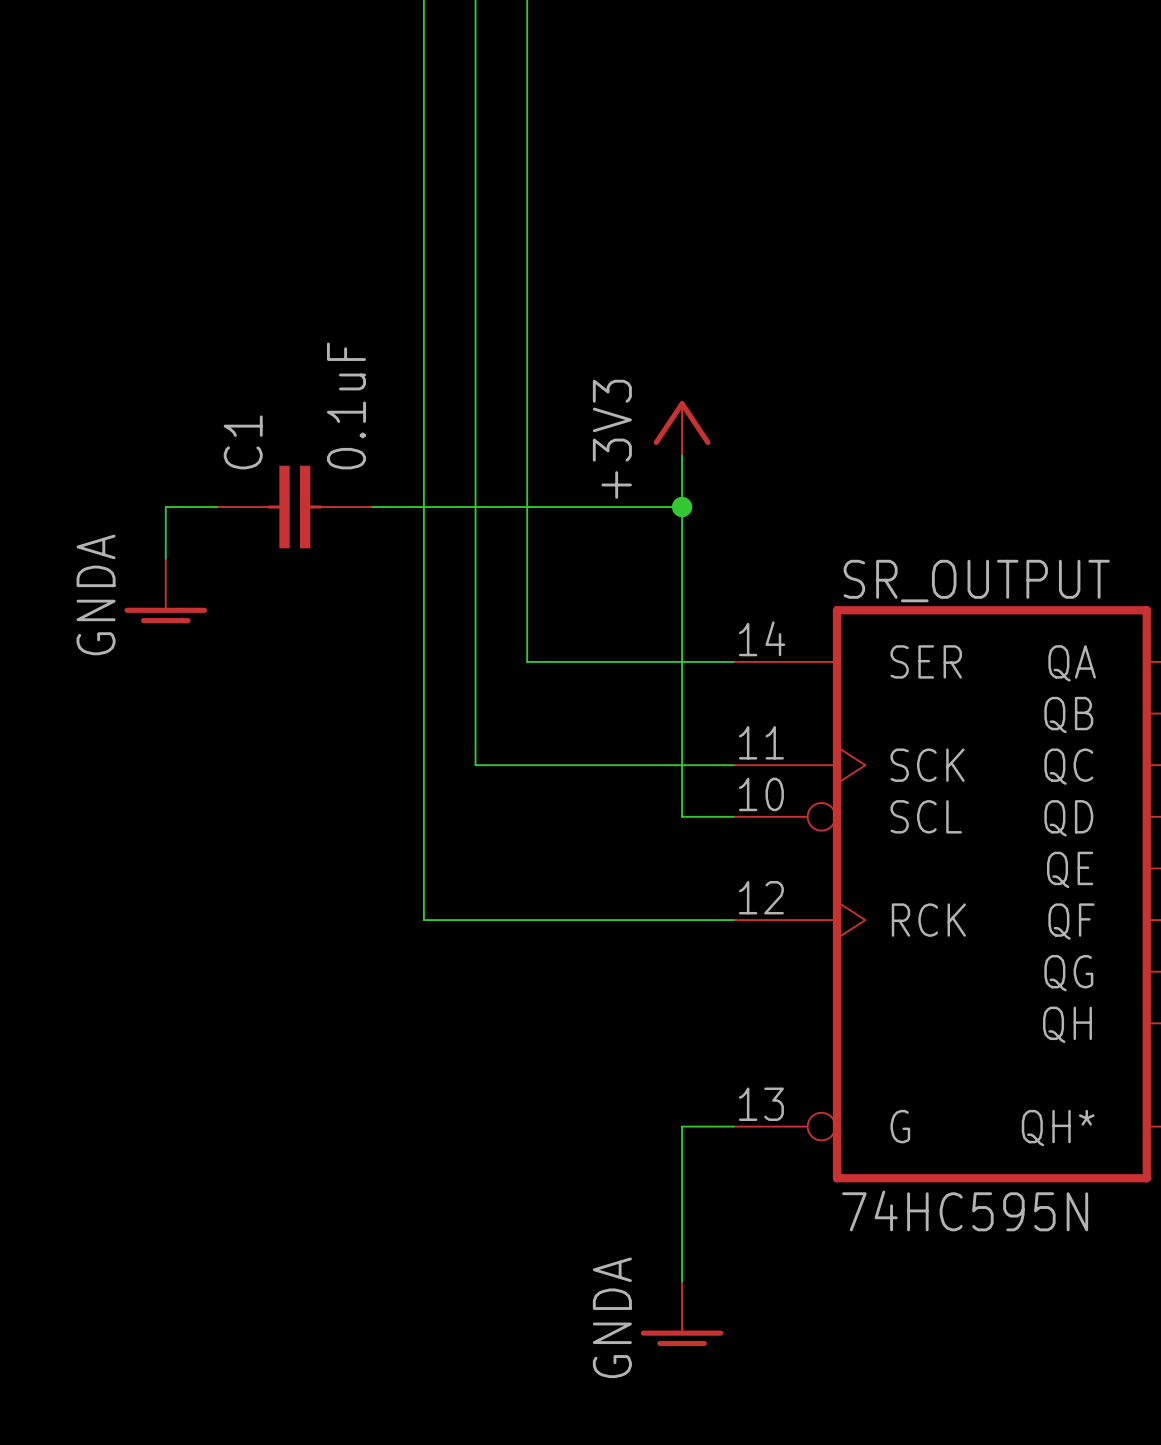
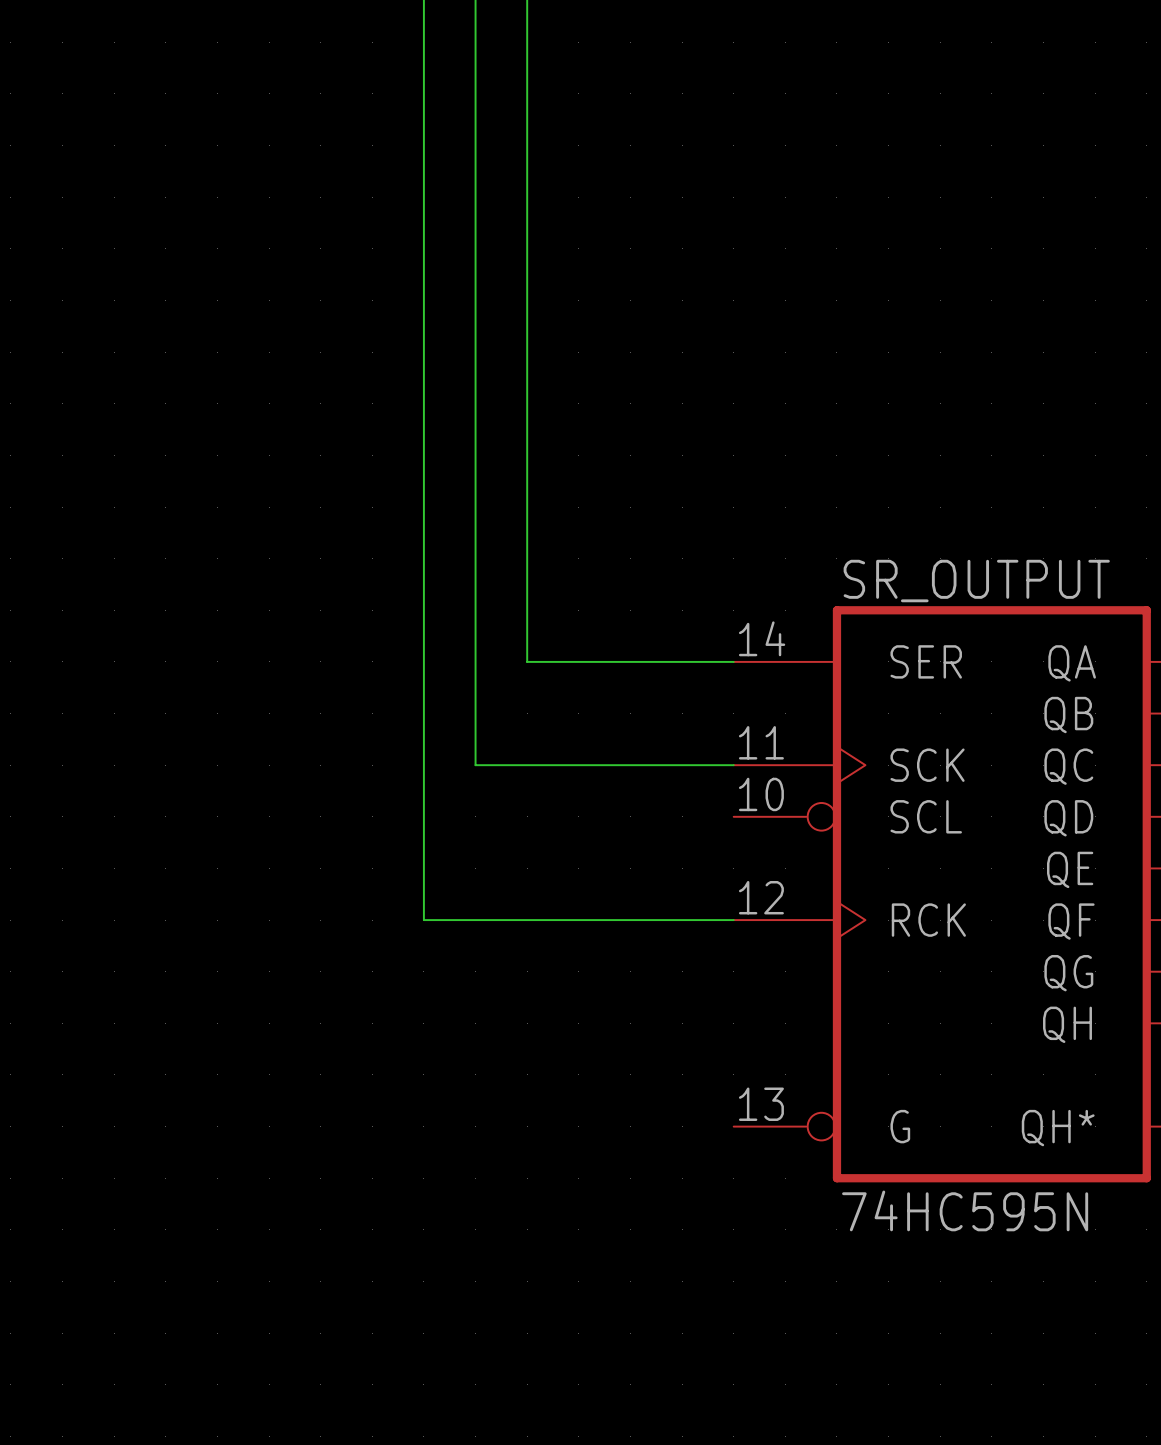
power symbol: +3V3 (682, 428) -> none
wire: (682, 455) (682, 816) (733, 816) -> none
wire: (217, 507) (165, 507) (165, 558) -> none
C1: 0.1uF (294, 507) -> none
wire: (372, 507) (682, 507) -> none
junction: (682, 507) -> none
power symbol: GNDA (165, 590) -> none
wire: (733, 1126) (682, 1126) (682, 1281) -> none
power symbol: GNDA (682, 1313) -> none

